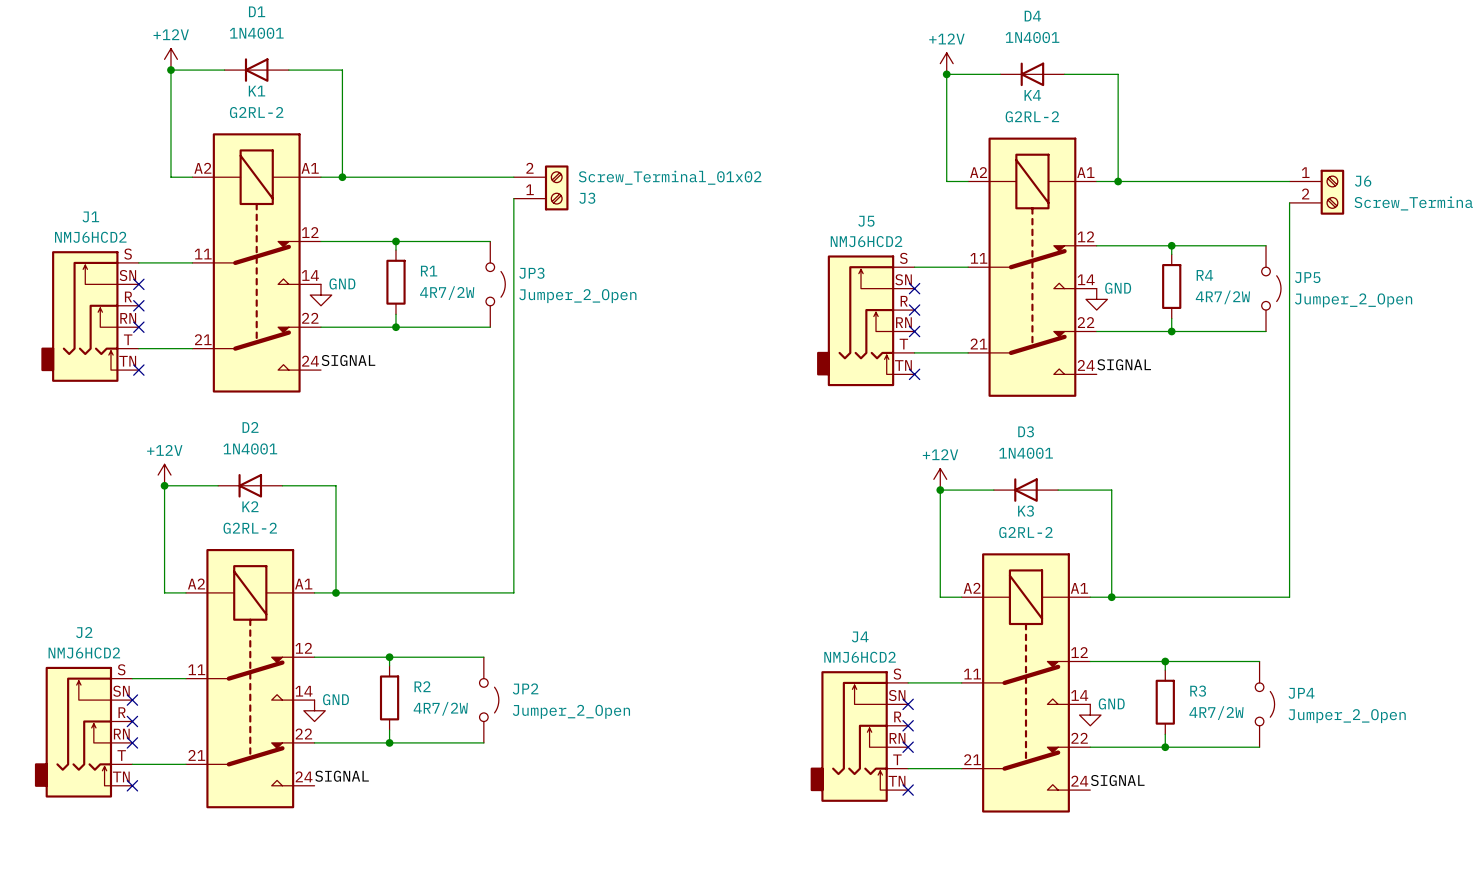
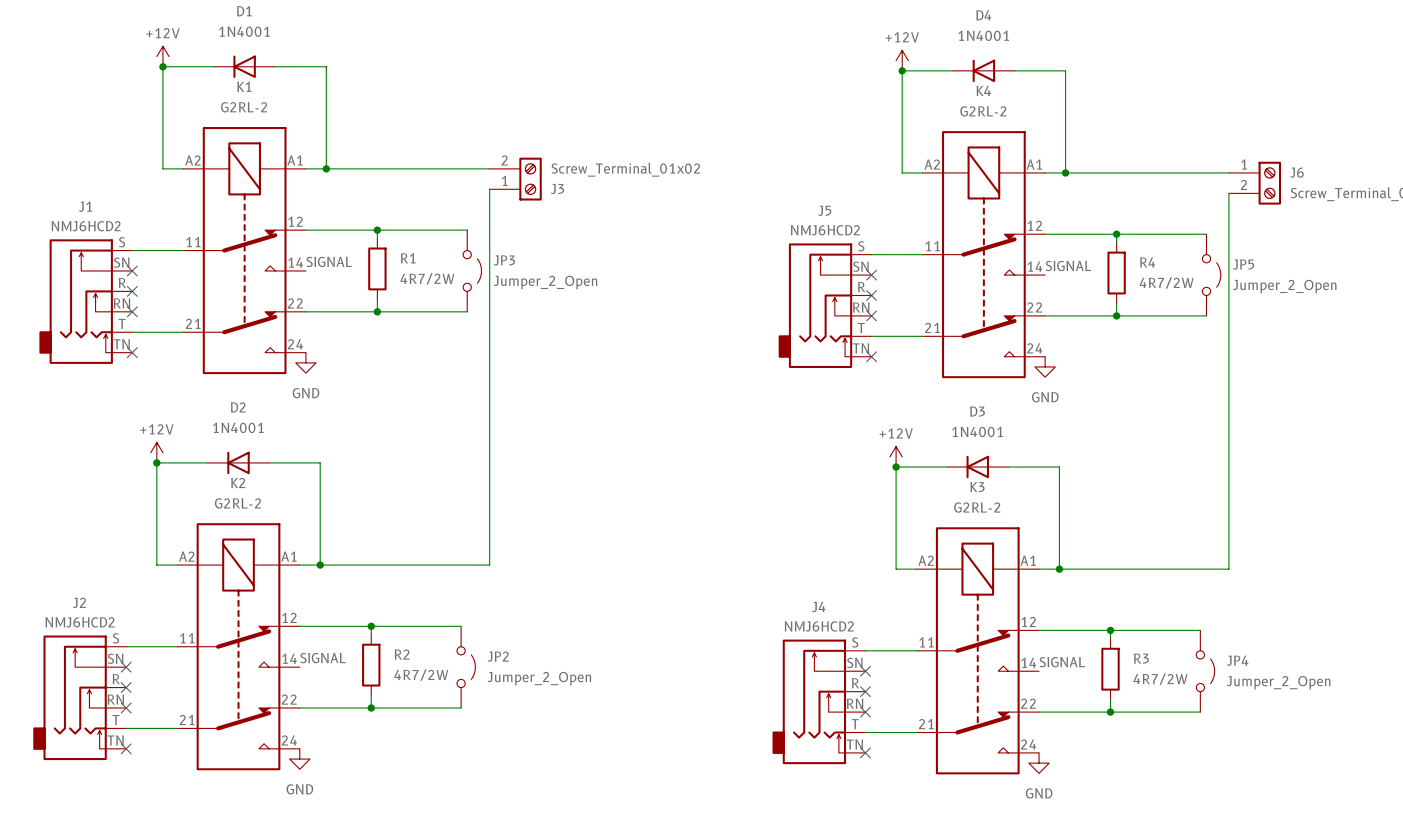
power symbol text position: GND (342, 283) -> GND (305, 393)
power symbol text position: GND (1118, 288) -> GND (1045, 397)
power symbol position: GND (320, 295) -> GND (305, 362)
power symbol position: GND (1096, 299) -> GND (1045, 366)
label position: SIGNAL (348, 360) -> SIGNAL (329, 261)
label position: SIGNAL (1124, 364) -> SIGNAL (1068, 266)
power symbol text position: GND (335, 699) -> GND (299, 789)
power symbol text position: GND (1111, 703) -> GND (1039, 793)
power symbol position: GND (314, 710) -> GND (299, 759)
power symbol position: GND (1090, 715) -> GND (1039, 763)
label position: SIGNAL (342, 776) -> SIGNAL (323, 658)
label position: SIGNAL (1117, 780) -> SIGNAL (1062, 662)

